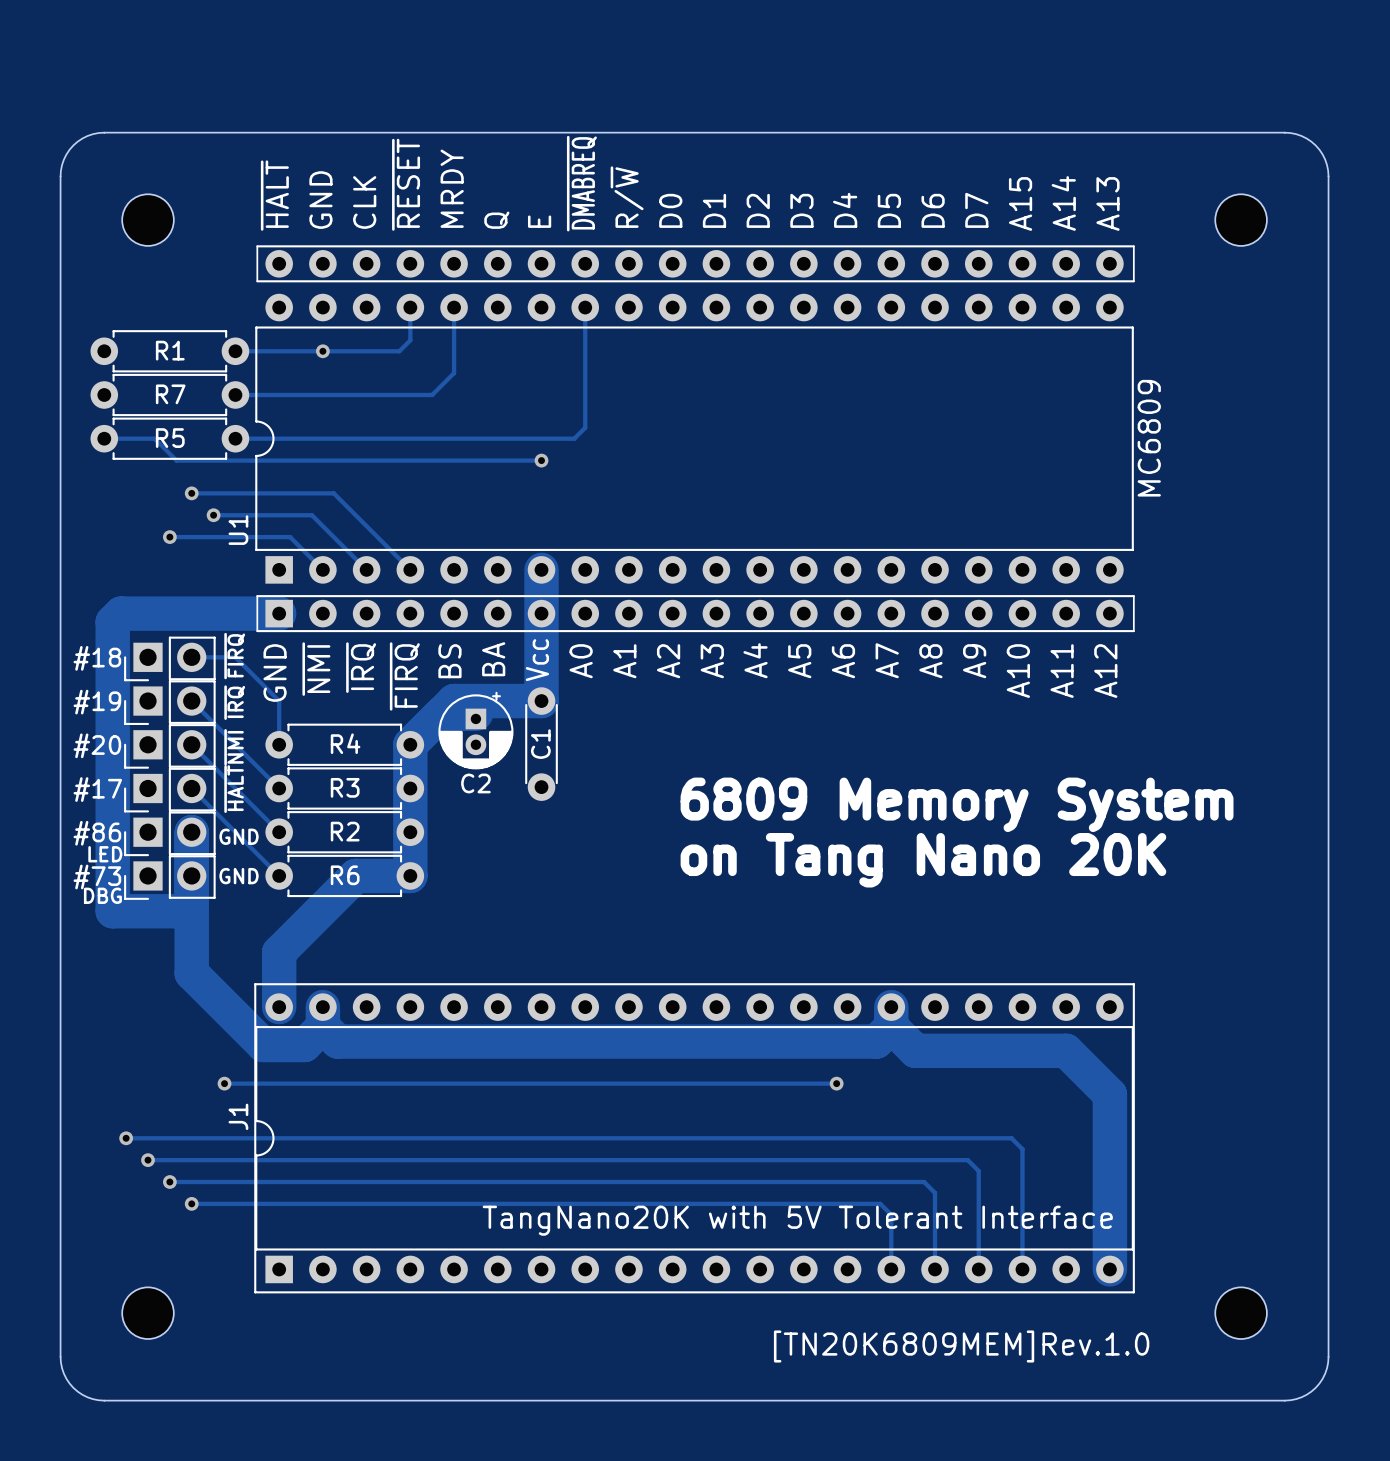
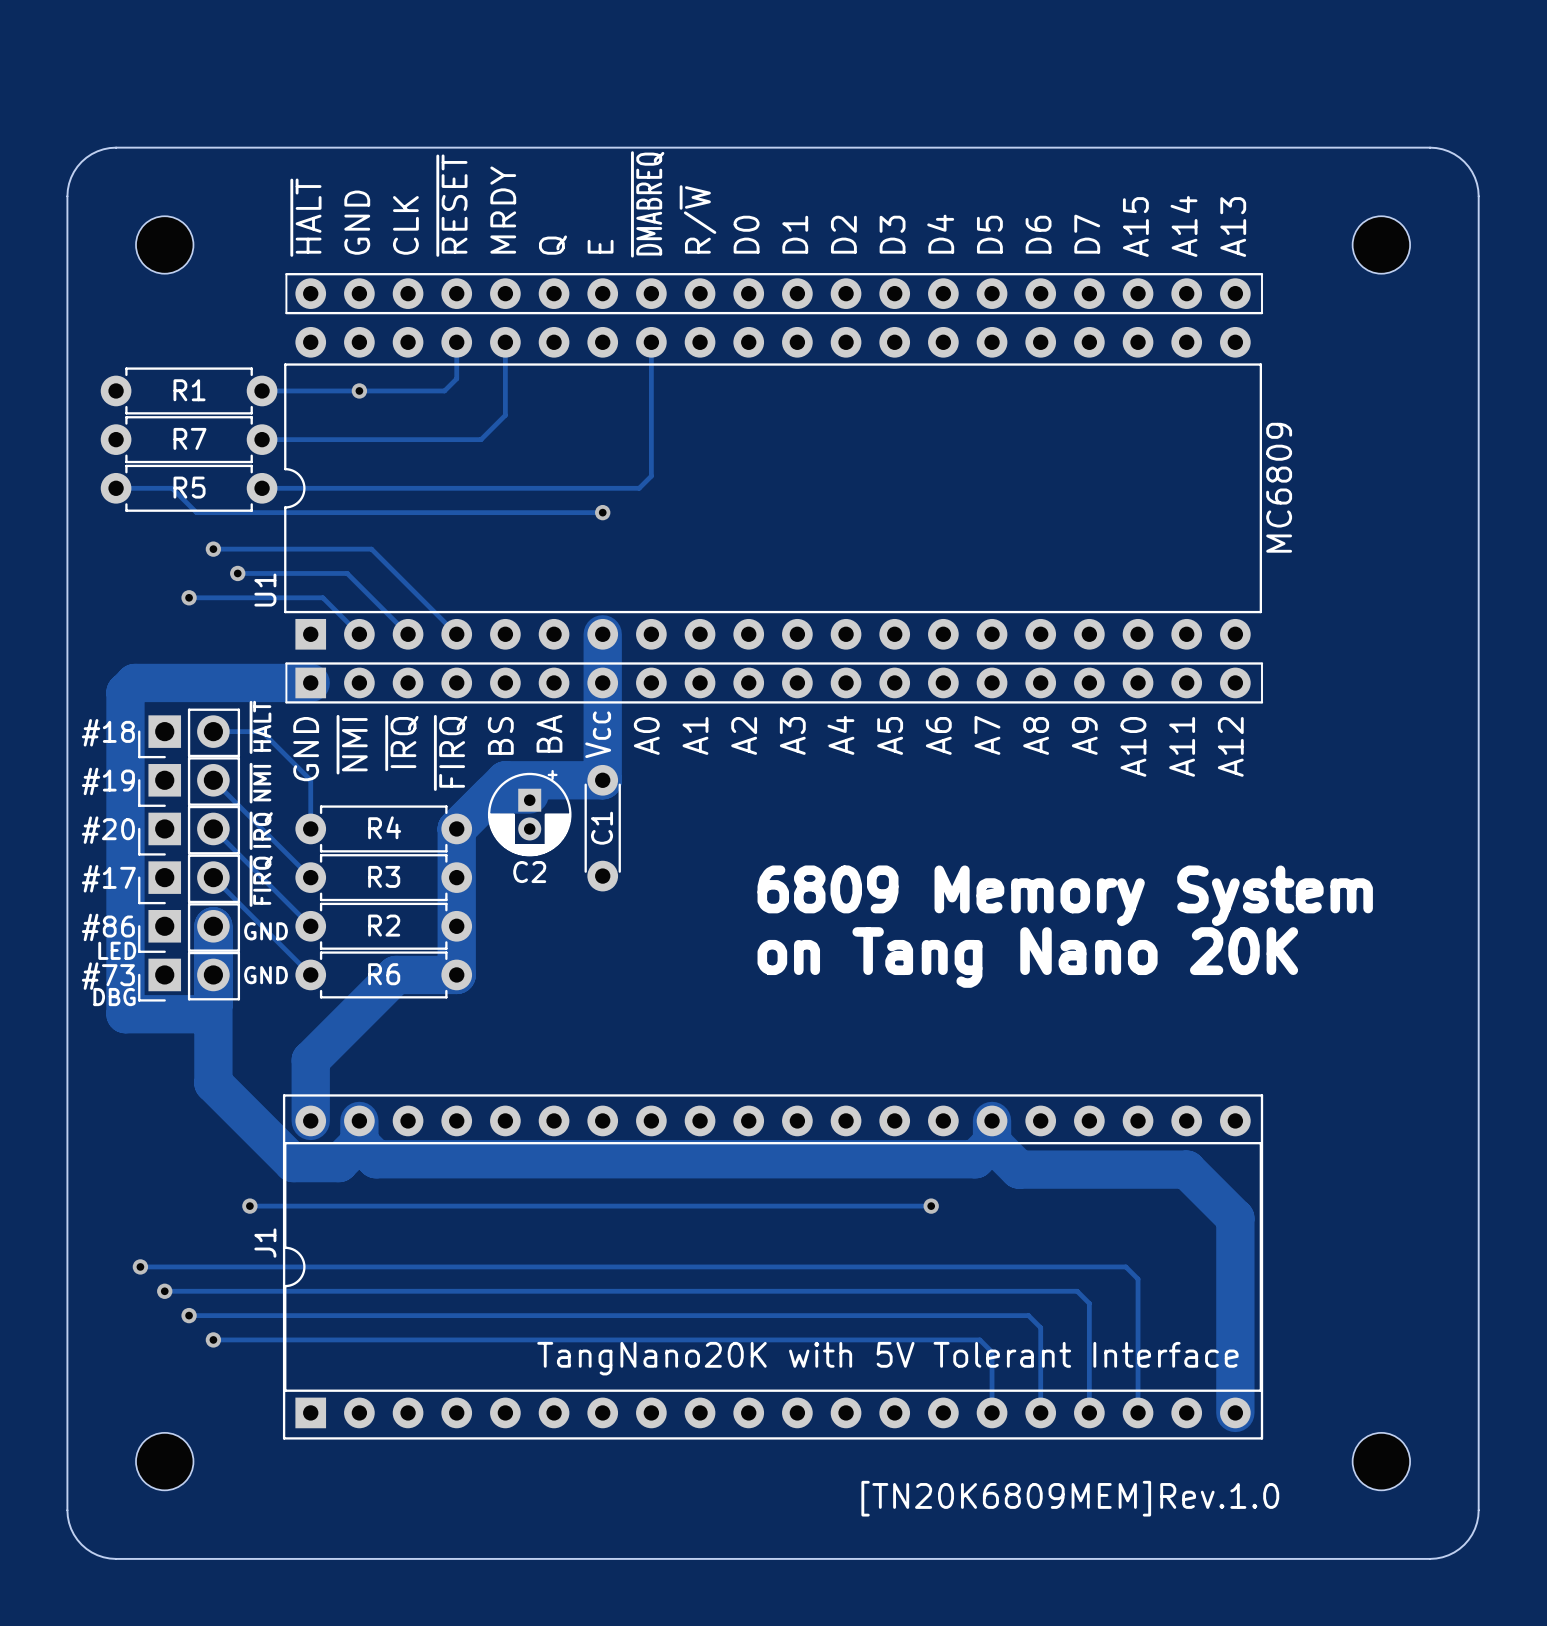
text position: ~{FIRQ} (234, 656) -> ~{FIRQ} (261, 881)
text: ~{IRQ} (234, 702) -> ~{NMI} (260, 783)
text: ~{NMI} (234, 747) -> ~{IRQ} (261, 830)
text position: ~{HALT} (234, 789) -> ~{HALT} (260, 727)

